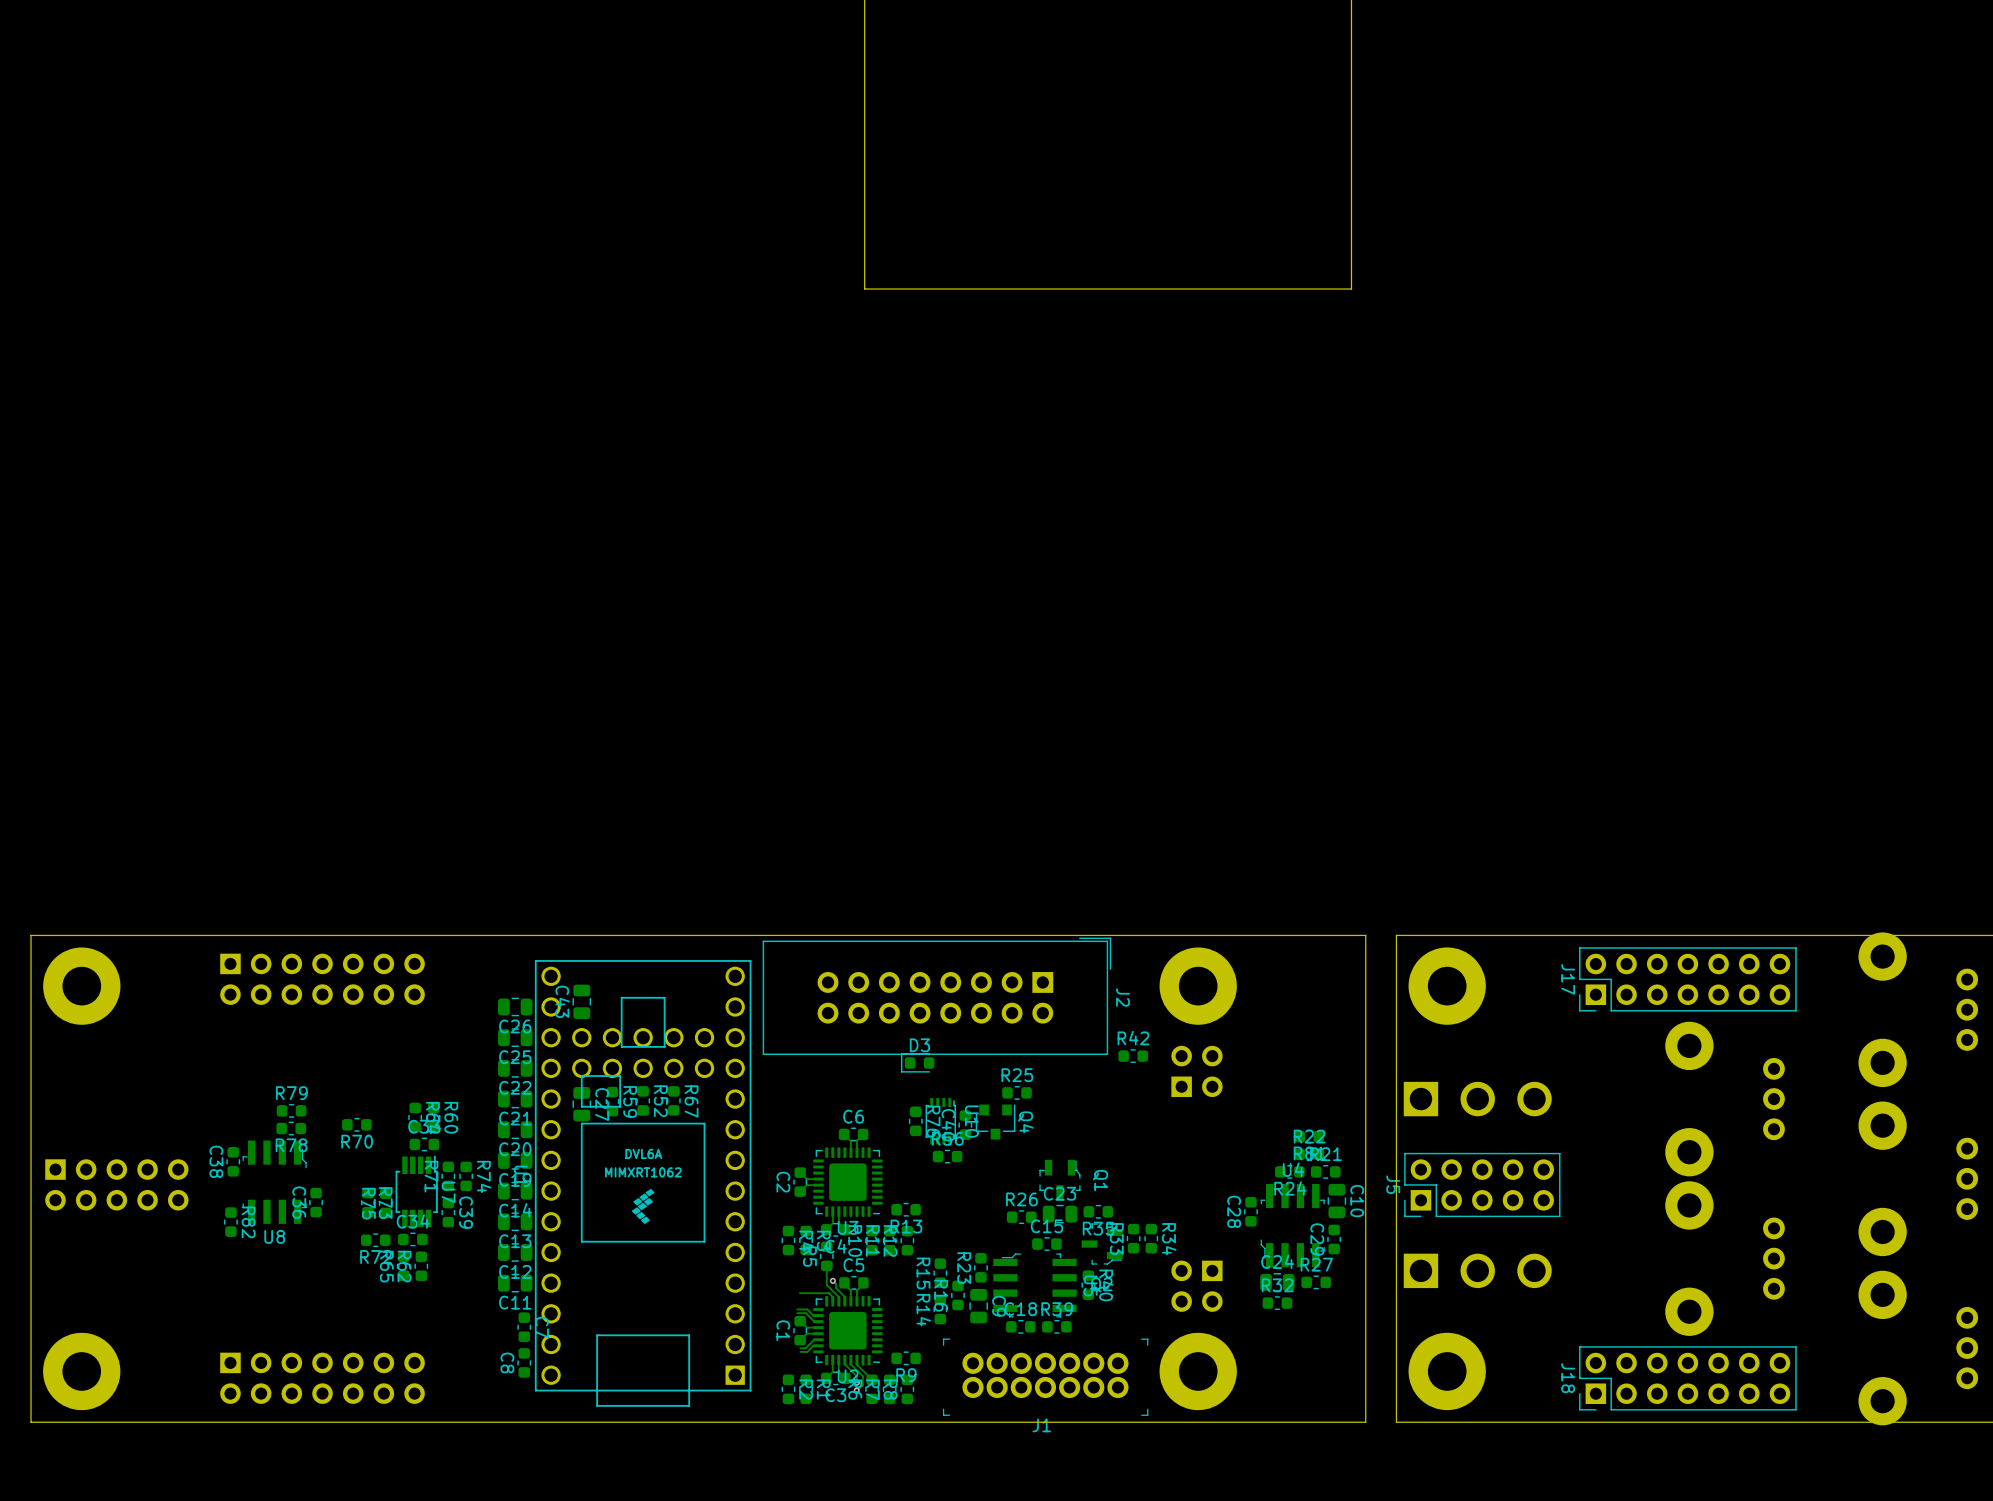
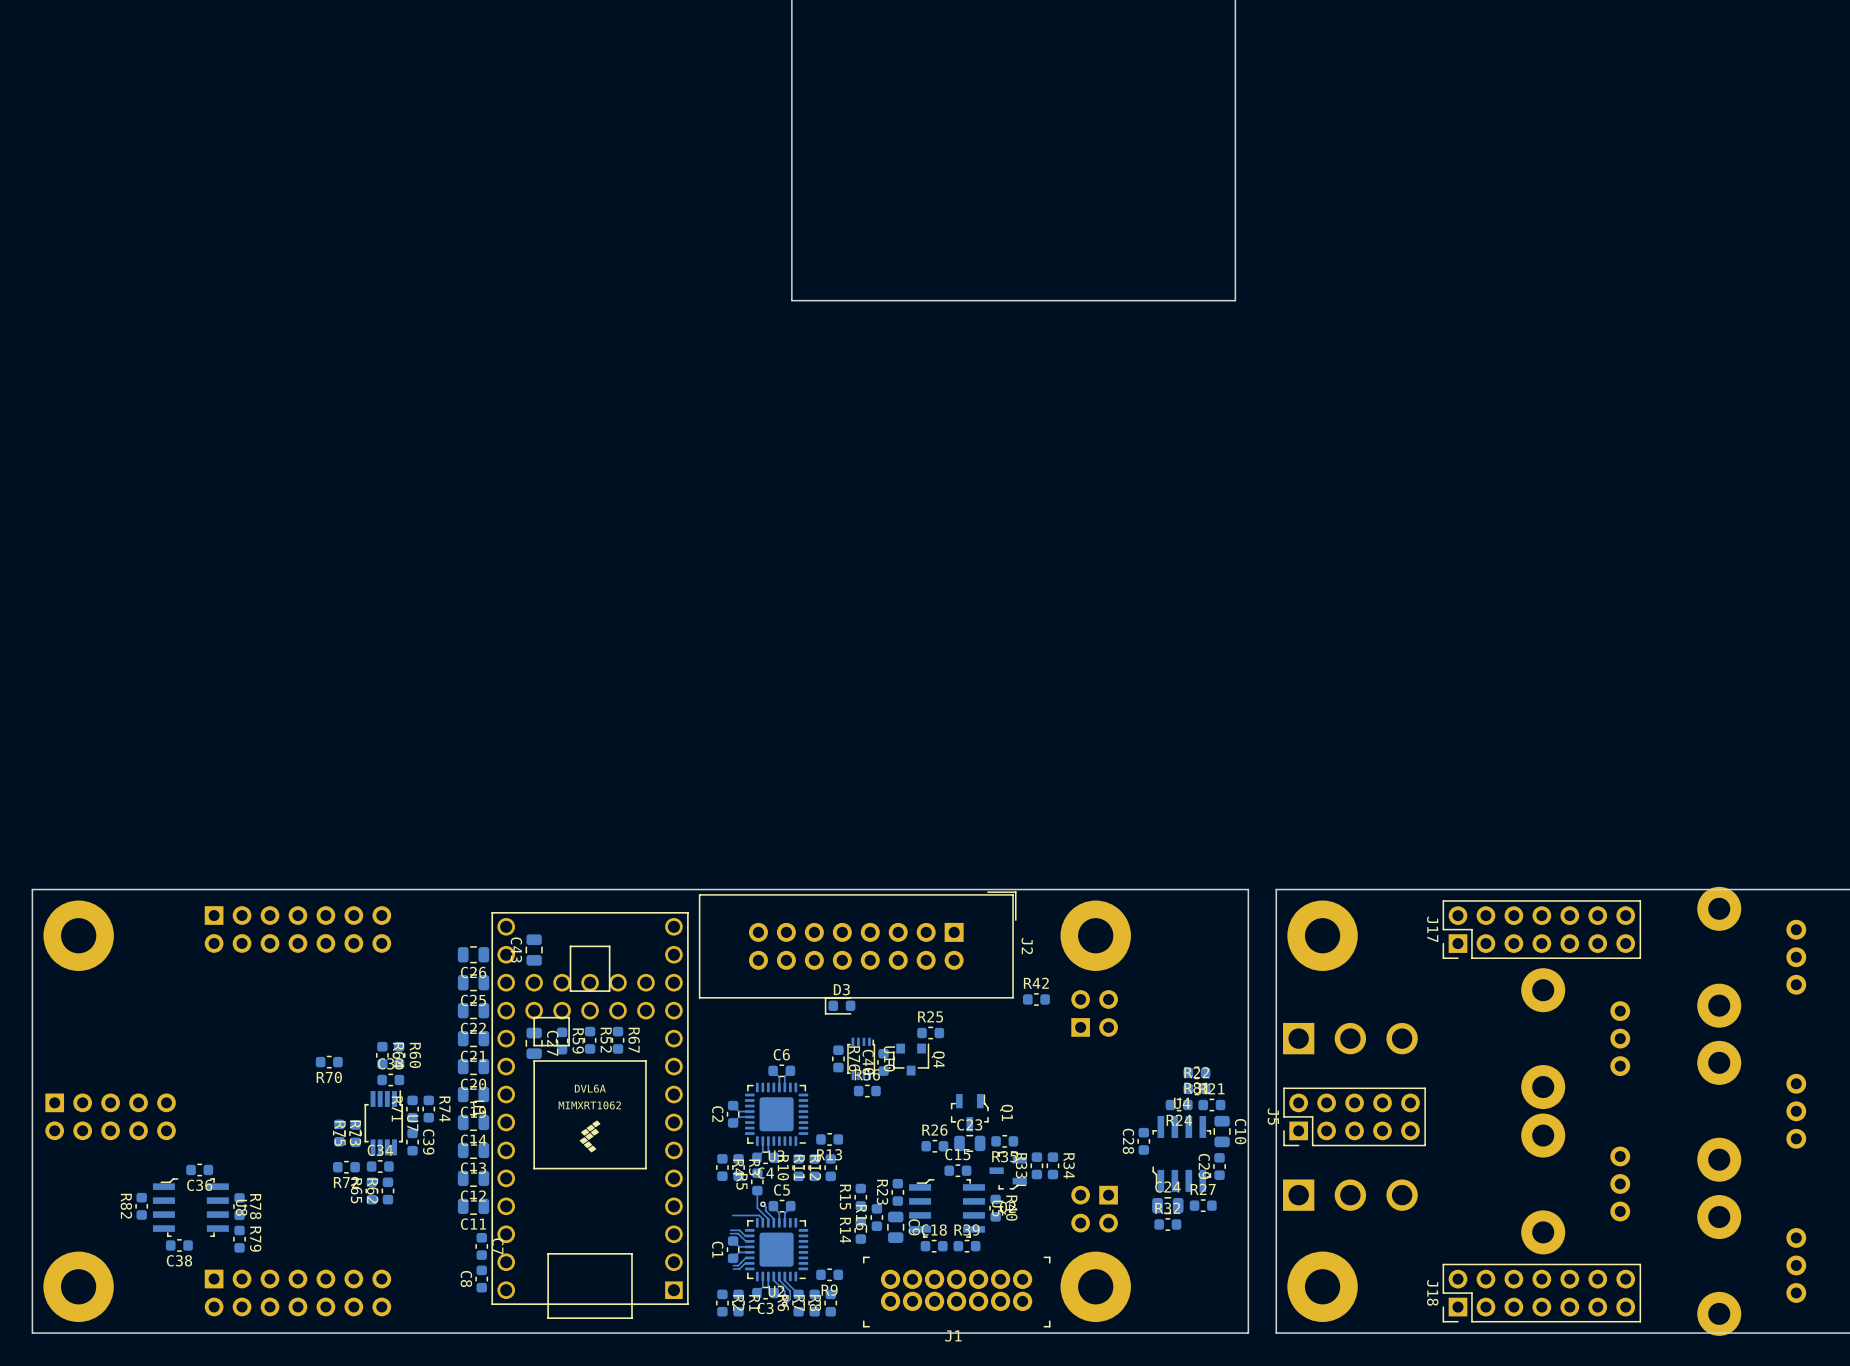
R79 rotation: 0° (291, 1110) -> 90° clockwise (239, 1239)
R79 position: (291, 1110) -> (239, 1239)
R78 rotation: 0° (291, 1128) -> 90° clockwise (239, 1206)
R78 position: (291, 1128) -> (239, 1206)
R78 name position: R78 (291, 1145) -> R78 (255, 1206)
C38 name position: C38 (216, 1161) -> C38 (179, 1260)
C38 rotation: 0° (233, 1161) -> 90° clockwise (179, 1245)
C38 position: (233, 1161) -> (179, 1245)
U8 rotation: 0° (274, 1182) -> 90° counterclockwise (190, 1207)
U8 position: (274, 1182) -> (190, 1207)
C36 name position: C36 (299, 1202) -> C36 (199, 1185)
C36 rotation: 0° (316, 1202) -> 90° clockwise (199, 1170)
C36 position: (316, 1202) -> (199, 1170)
R82 position: (230, 1222) -> (141, 1206)
R82 name position: R82 (248, 1222) -> R82 (126, 1206)

